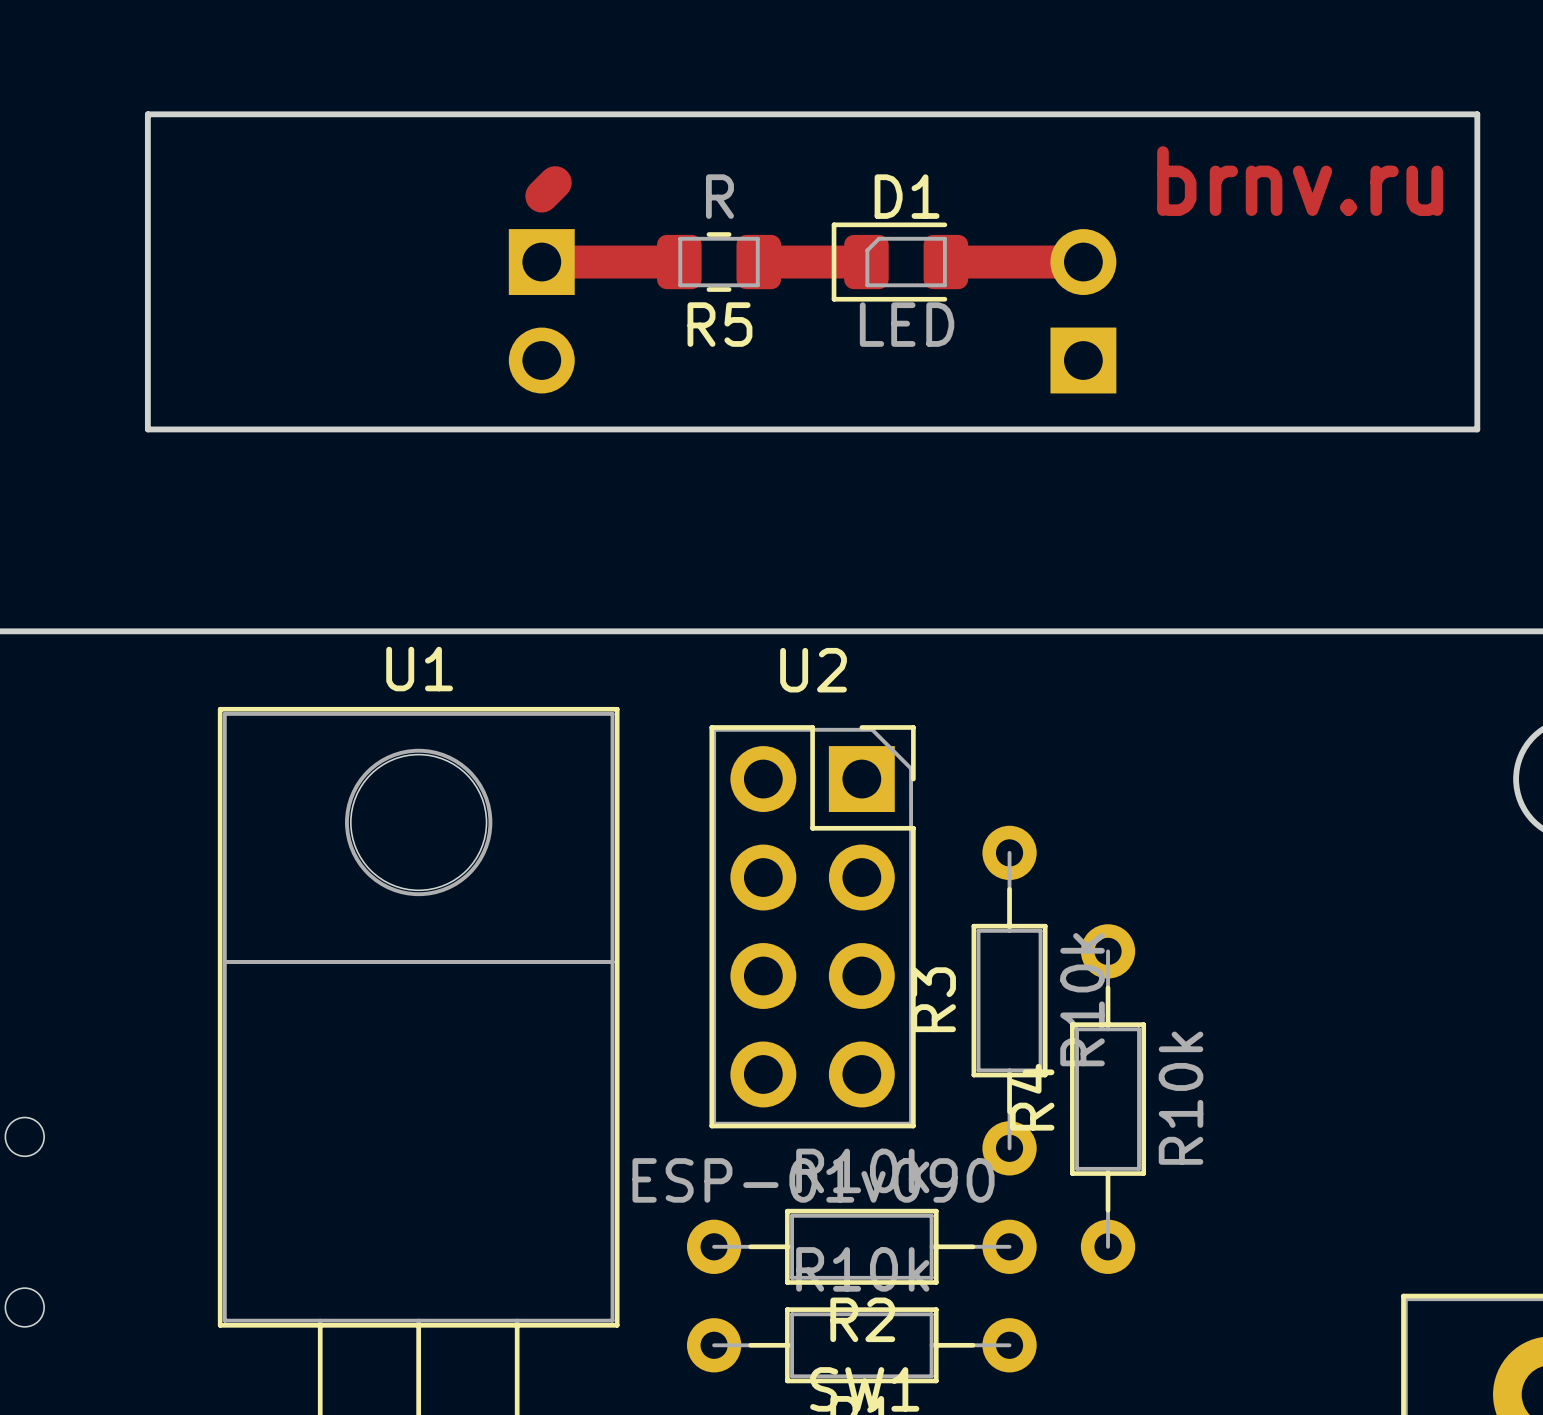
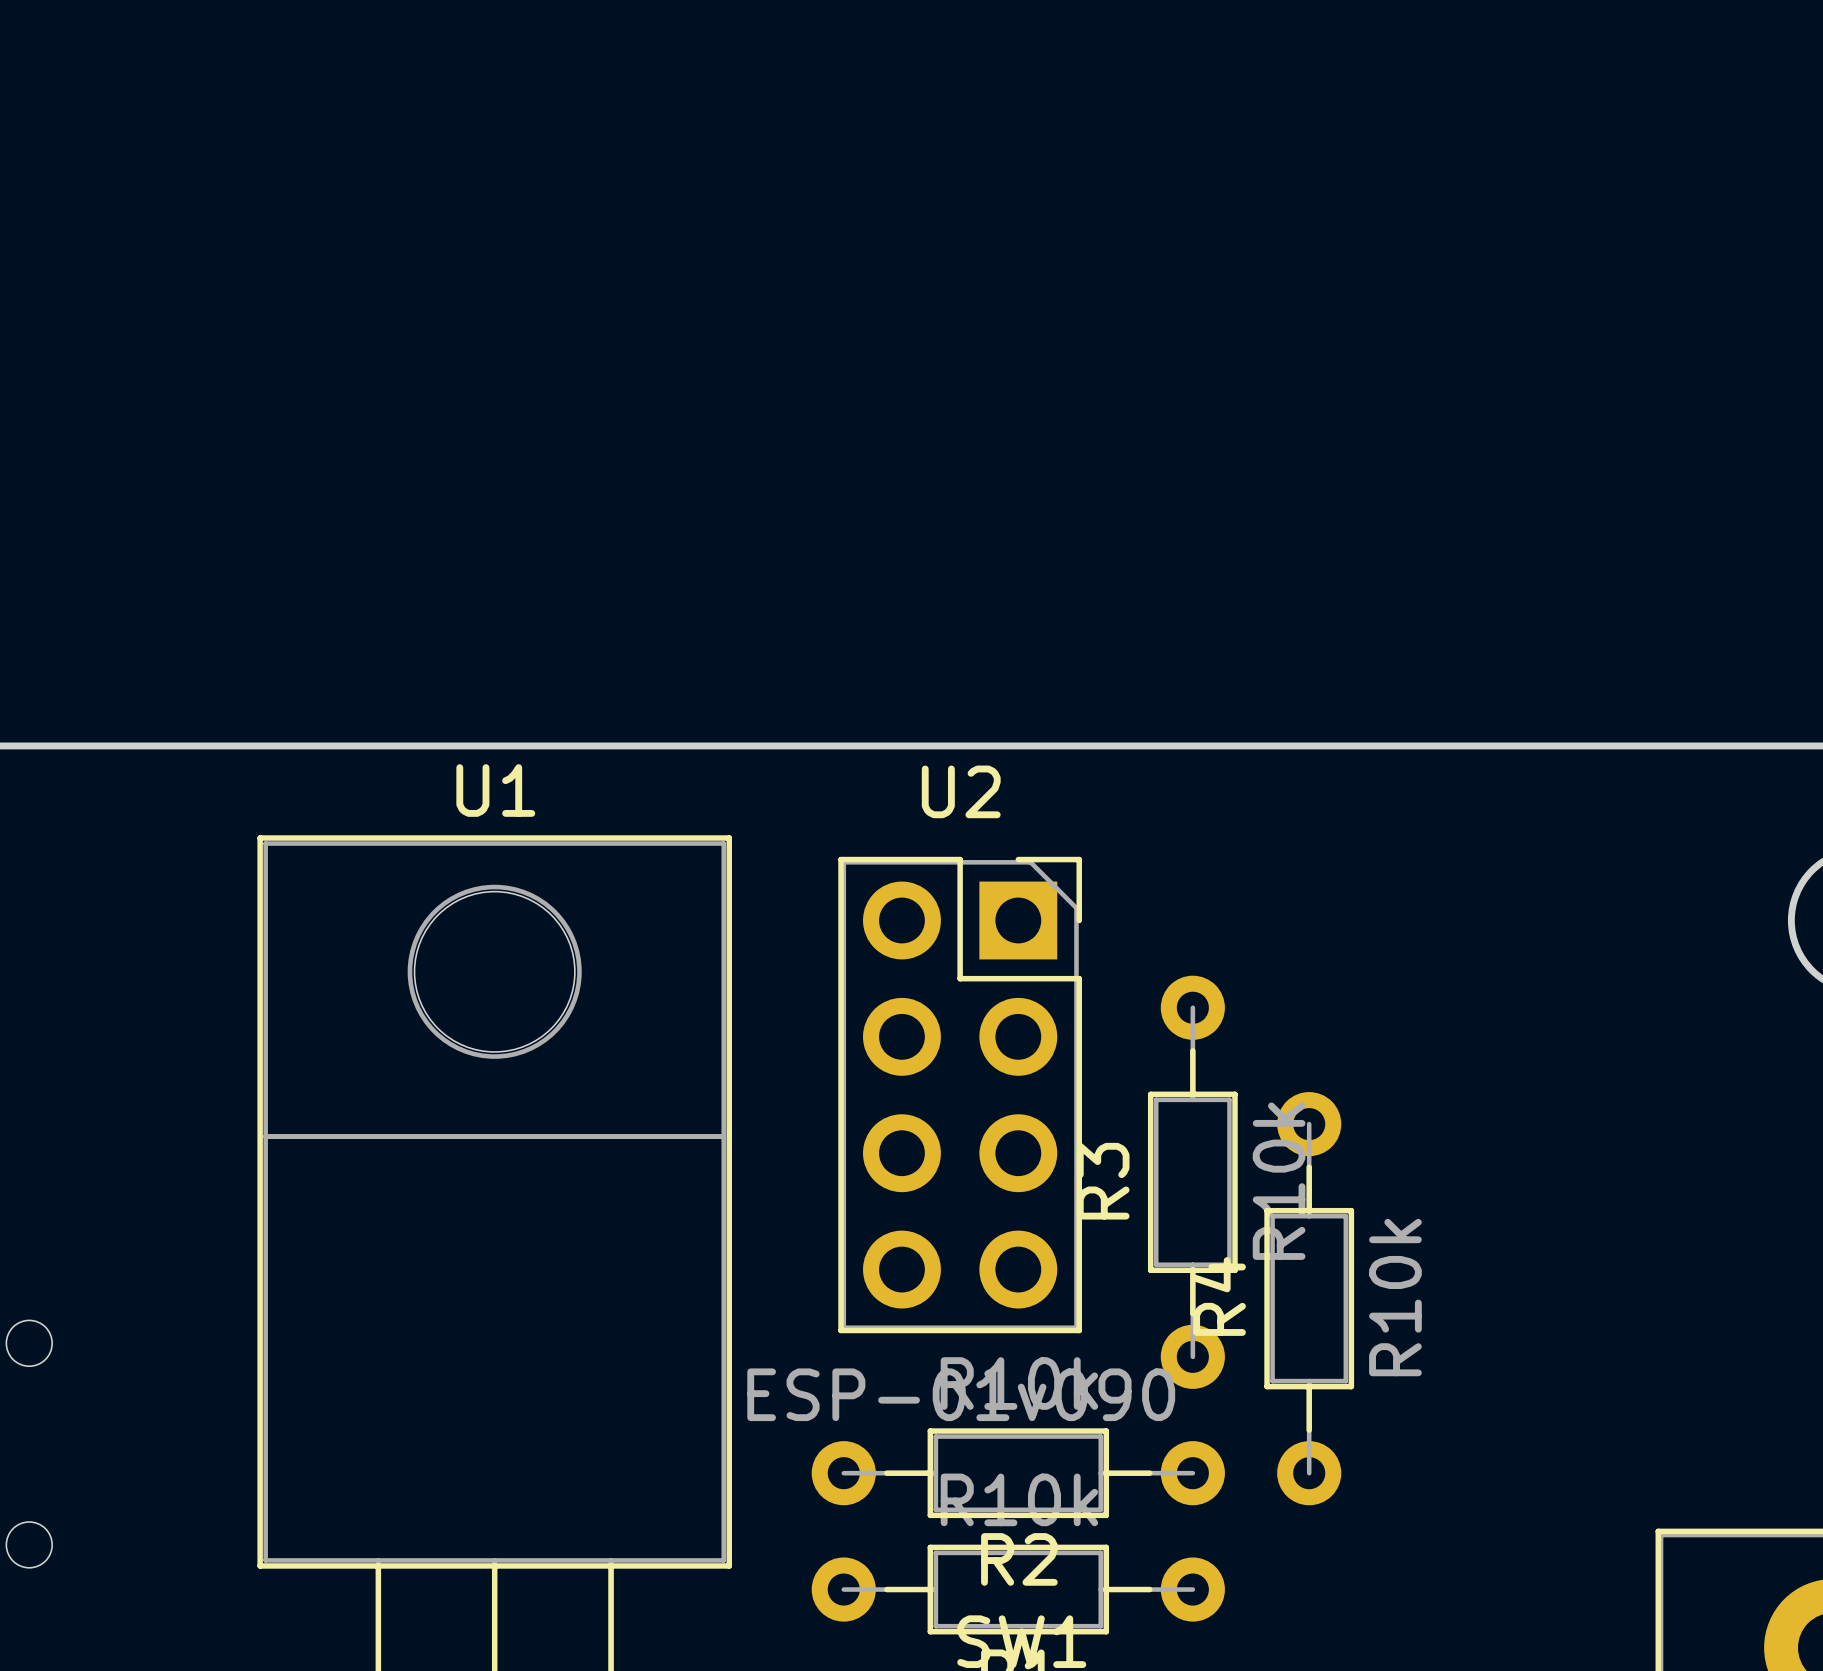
board edge: (147, 114) (147, 429) (1477, 429) (1477, 114) (147, 114) -> none
text: brnv.ru (1300, 181) -> none
track: (555, 182) (541, 196) -> none
track: (541, 262) (679, 262) -> none
R5: R (719, 262) -> none
track: (758, 262) (866, 262) -> none
D1: LED (899, 262) -> none
track: (945, 262) (1083, 262) -> none
part: (541, 311) -> none
part: (1083, 311) -> none

